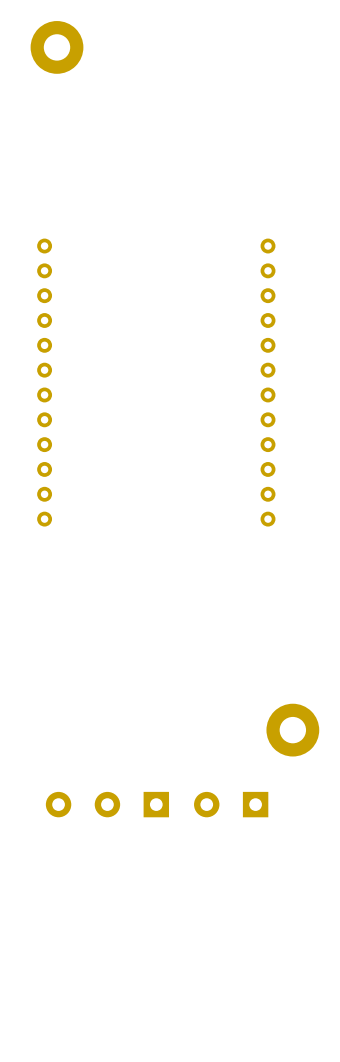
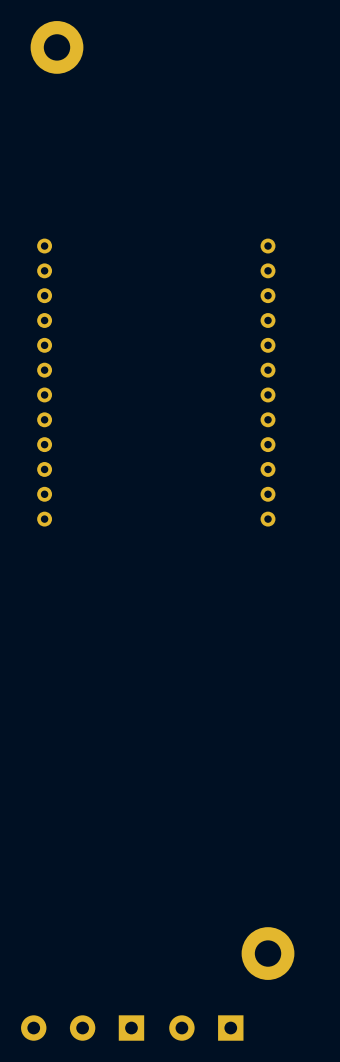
part position: (292, 730) -> (268, 953)
part position: (107, 804) -> (82, 1028)
part position: (231, 804) -> (206, 1028)

